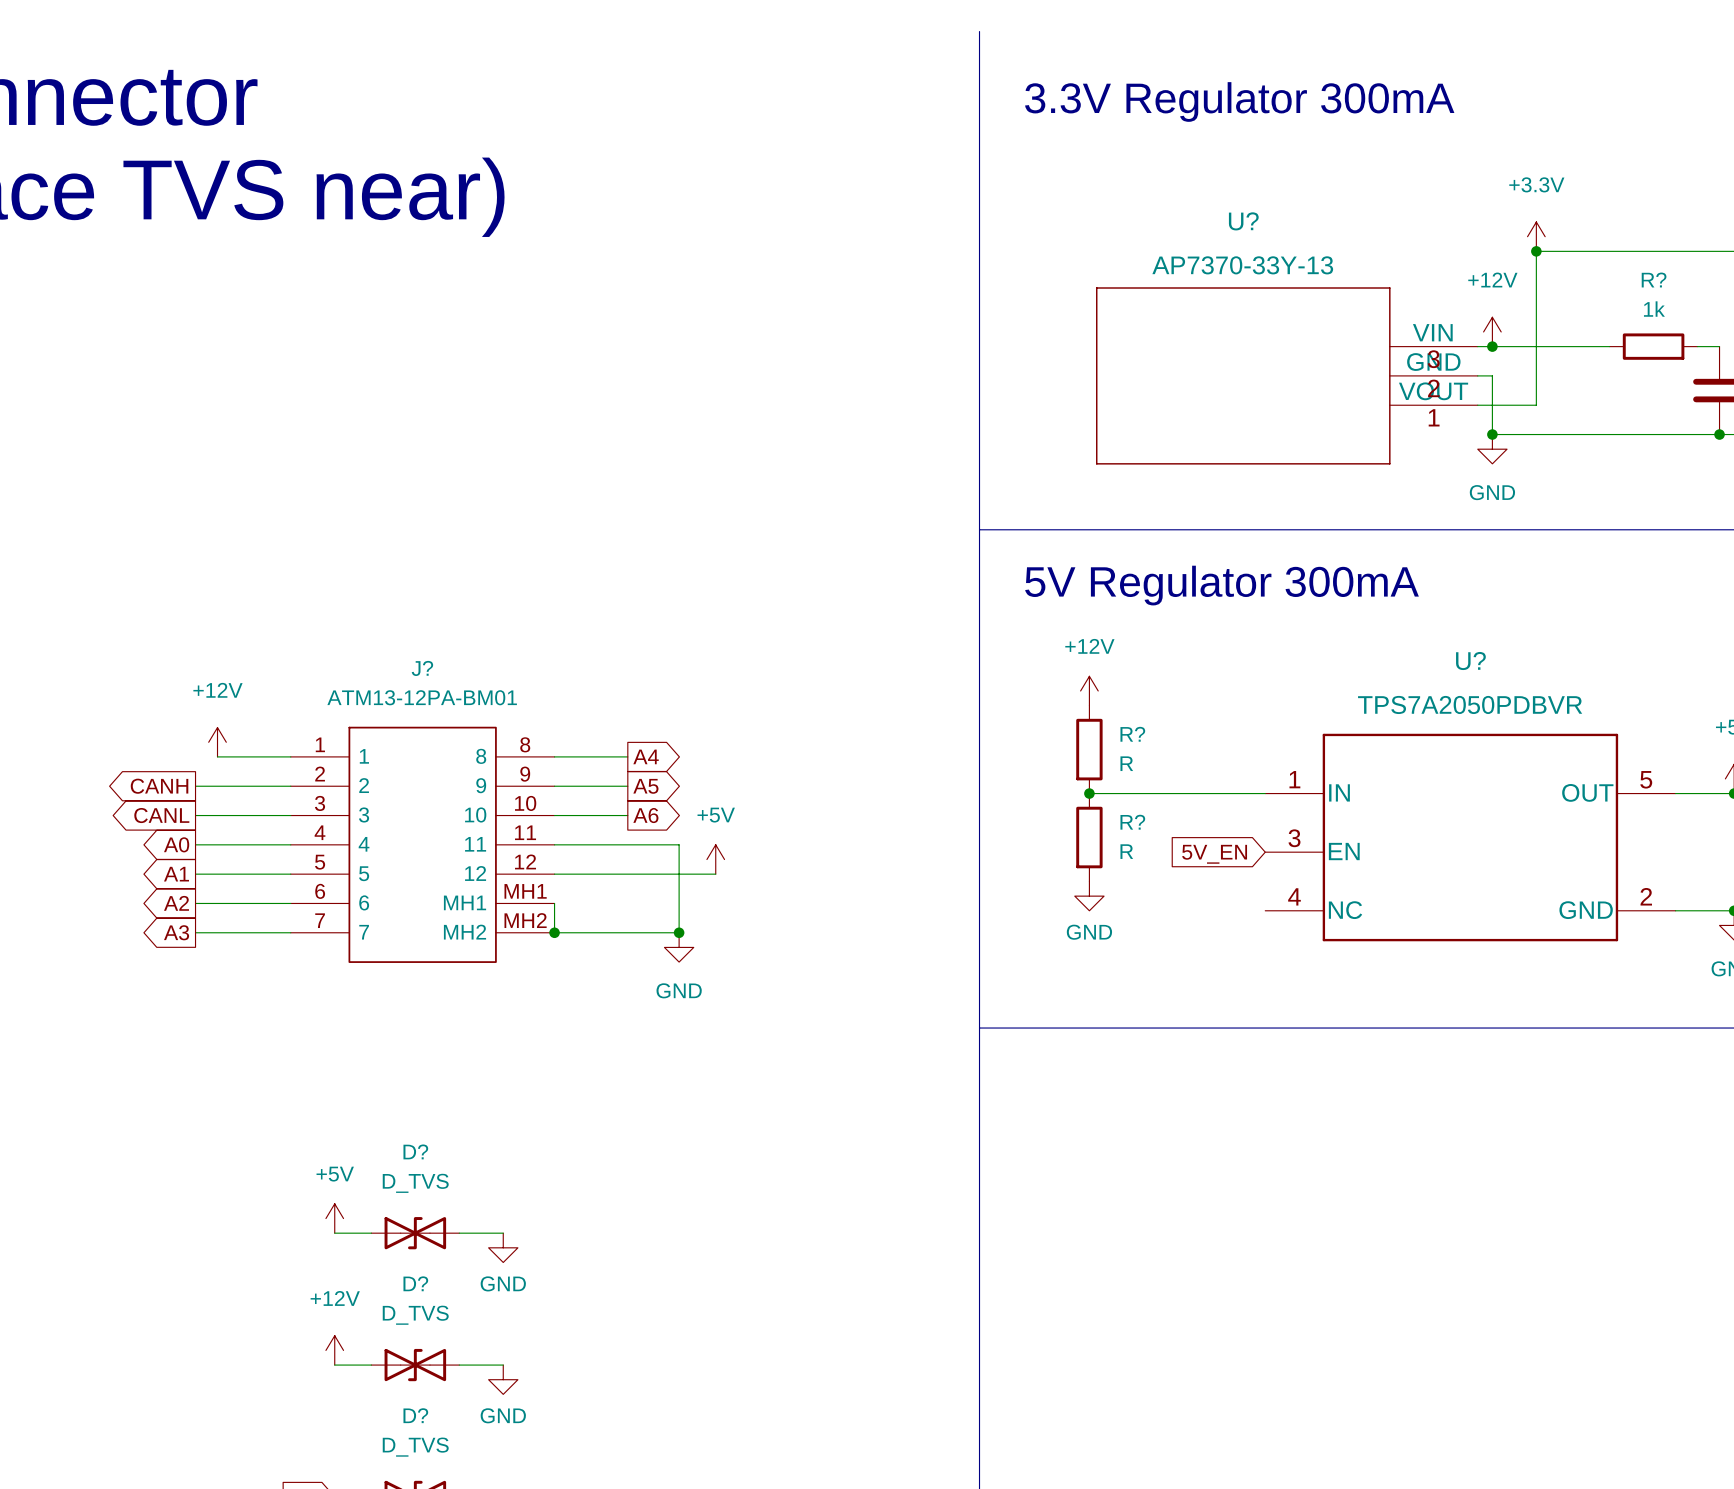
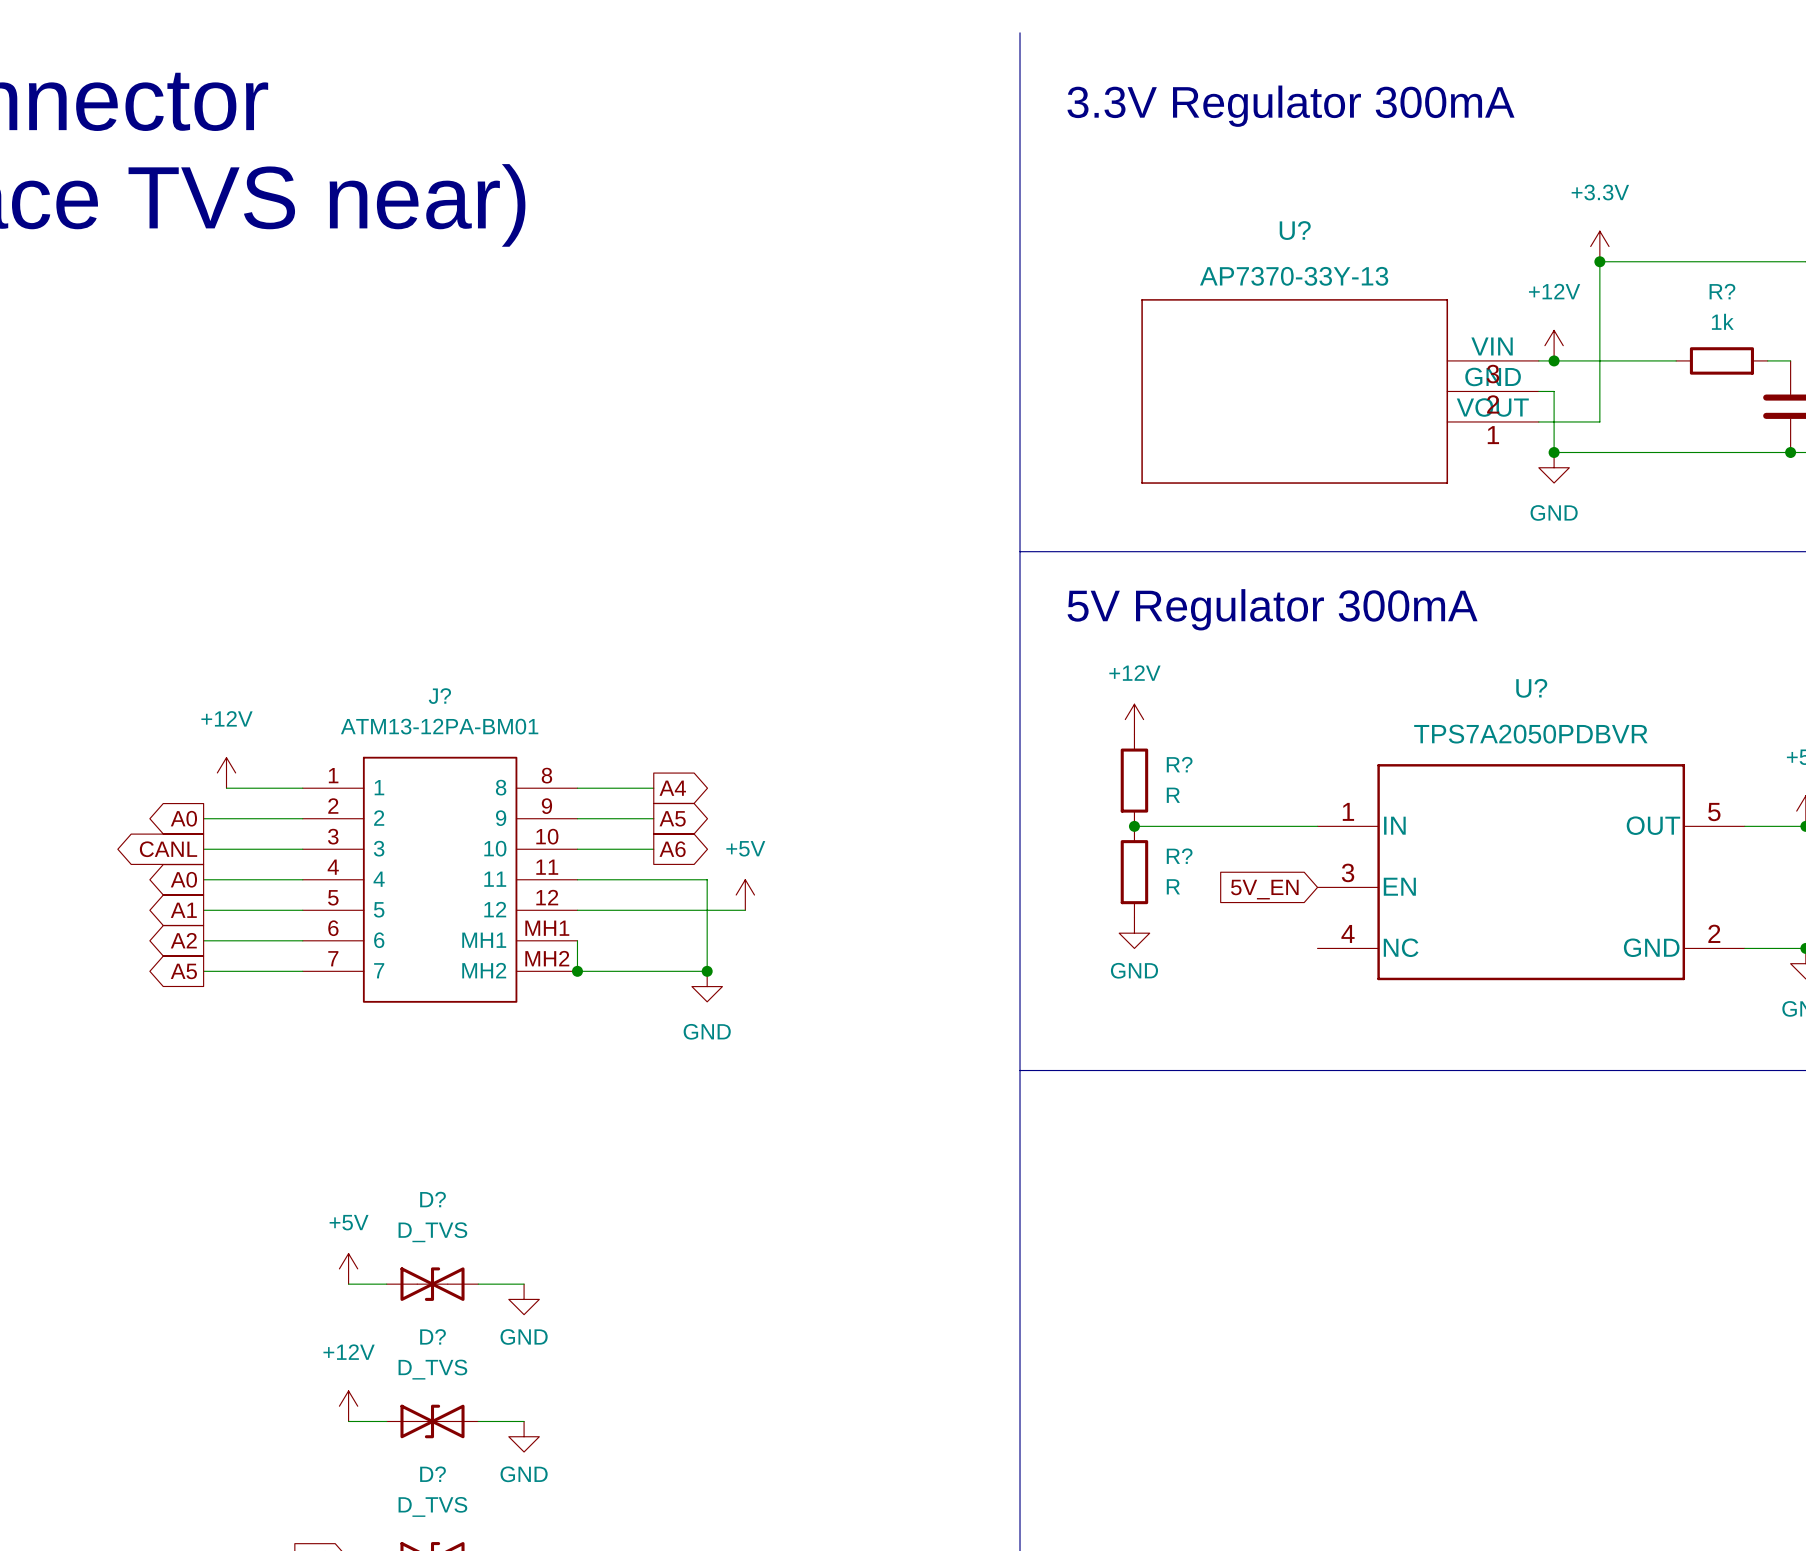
global label: CANH (159, 786) -> A0 (183, 818)
global label: A3 (176, 932) -> A5 (183, 971)

